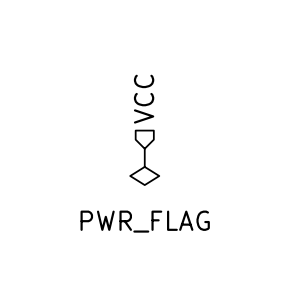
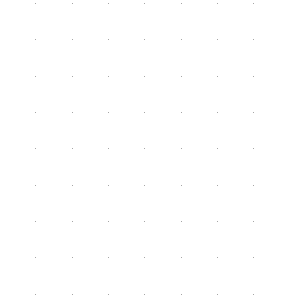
hierarchical label: VCC (144, 99) -> none
power symbol: PWR_FLAG (144, 166) -> none

